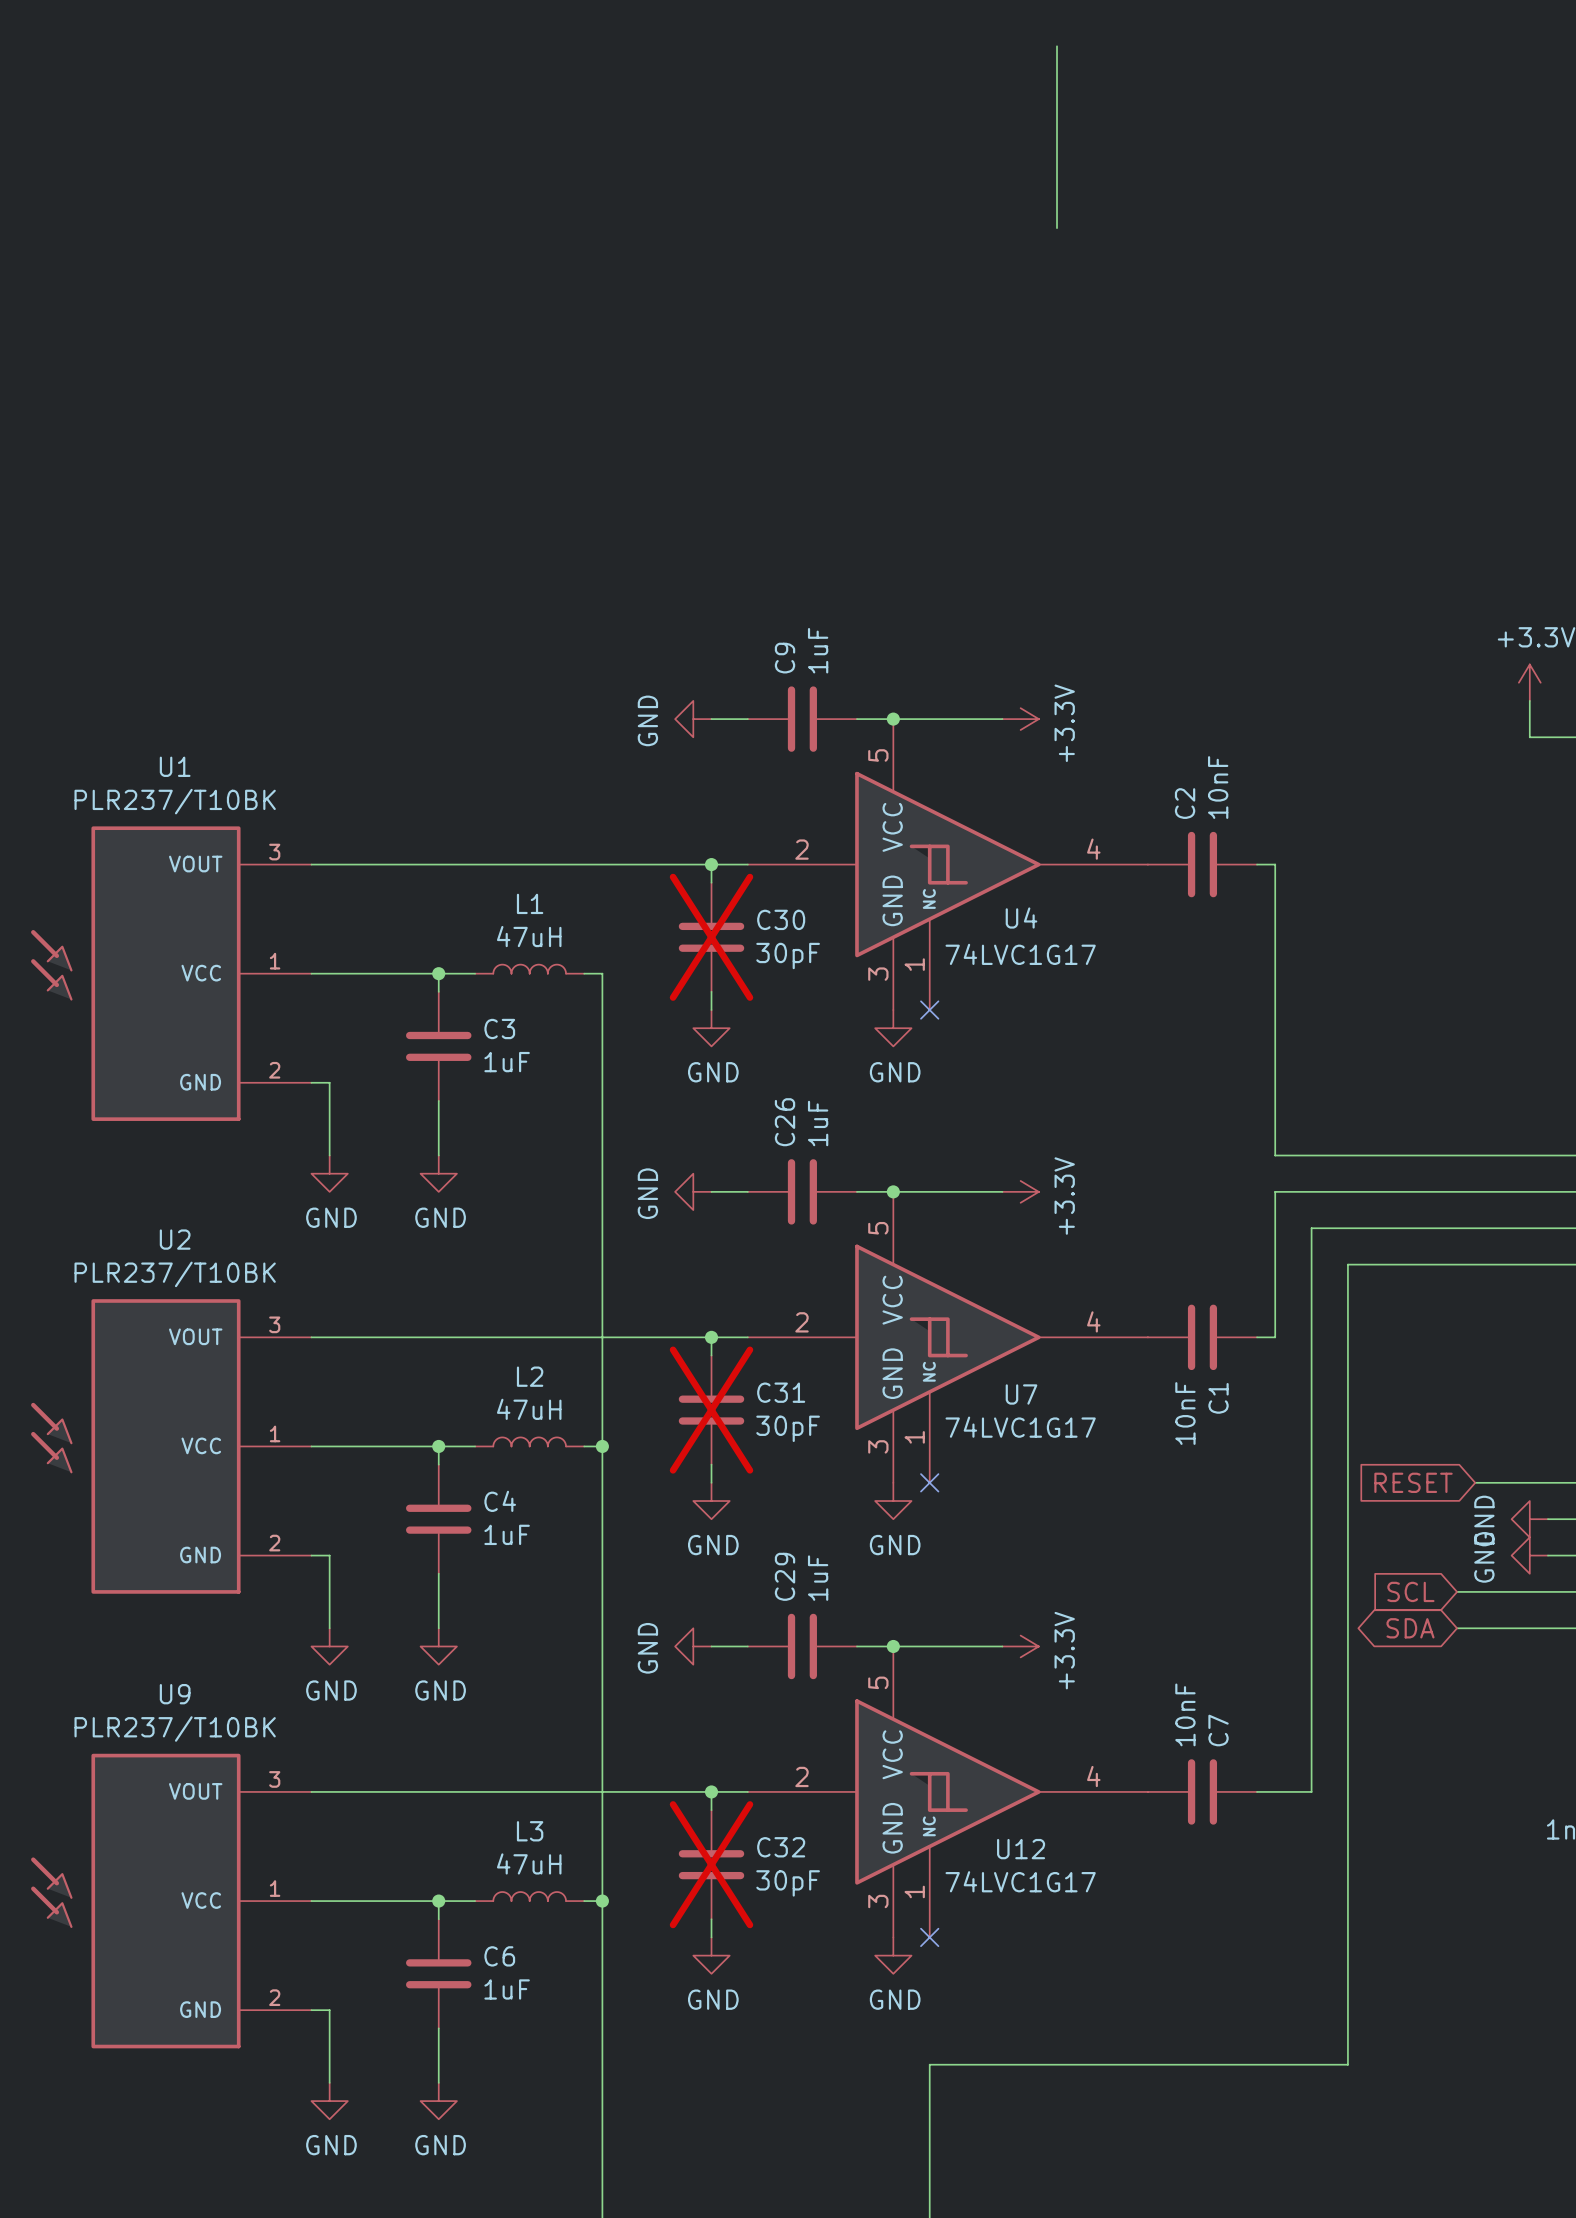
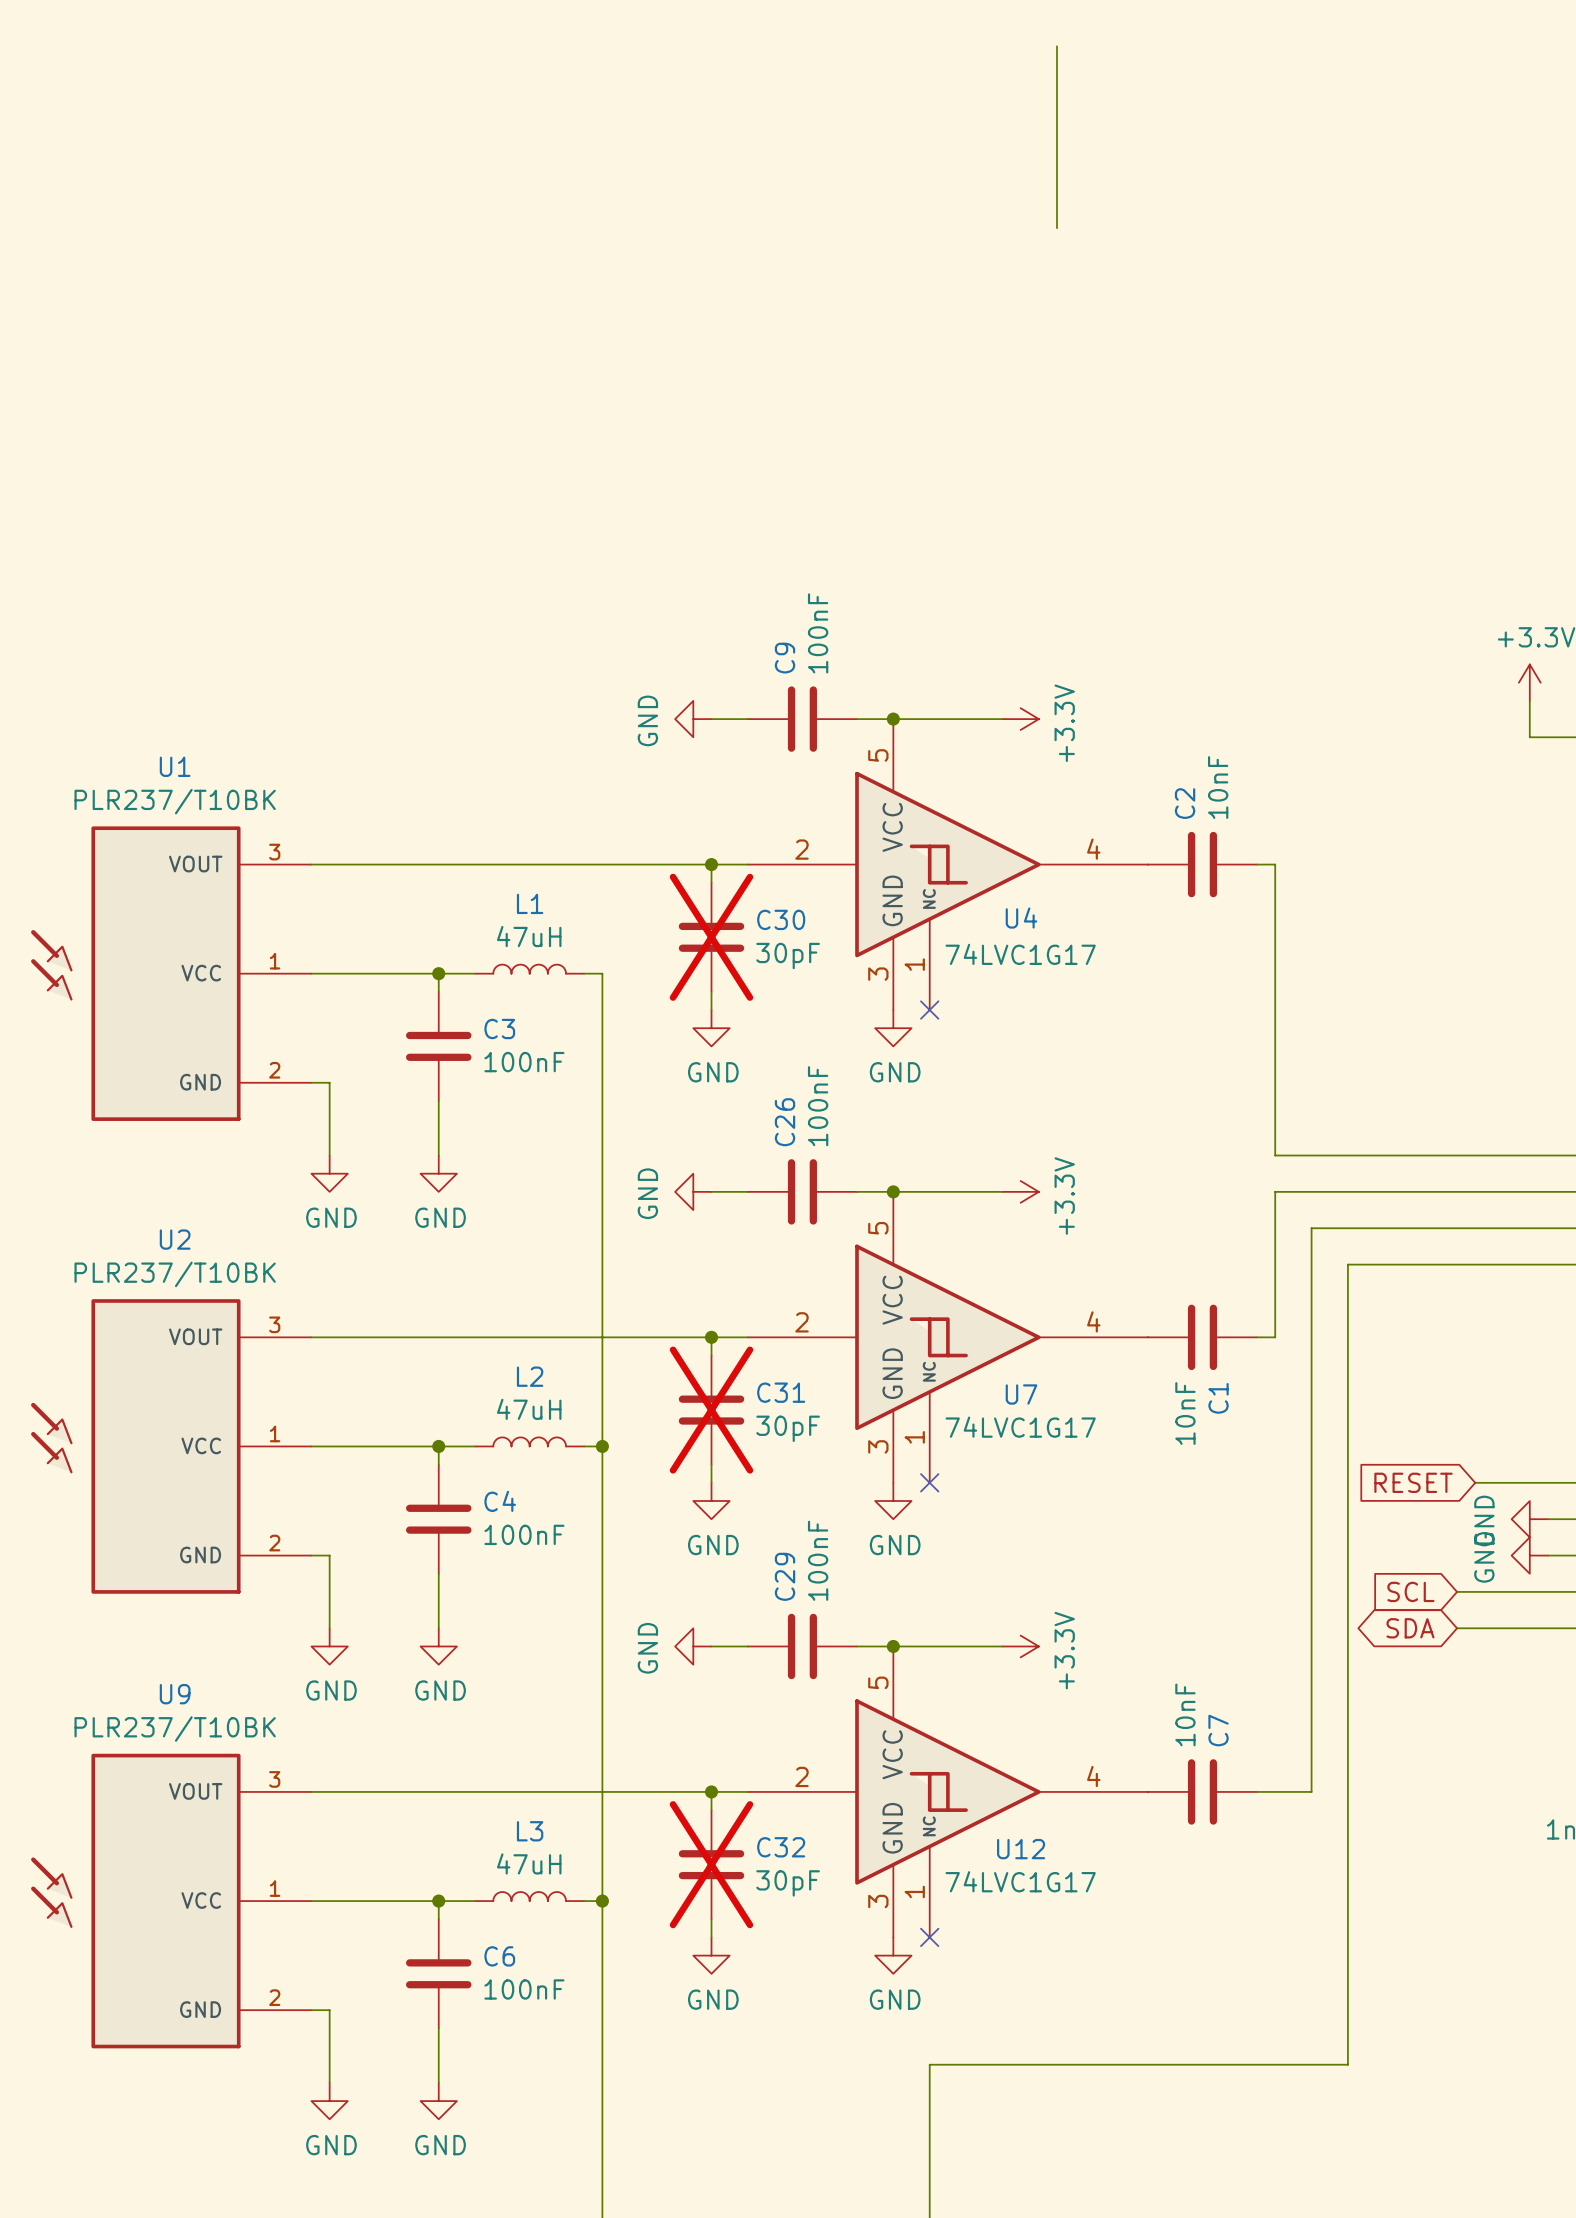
C9 value: 1uF (818, 650) -> 100nF (818, 633)
C3 value: 1uF (507, 1062) -> 100nF (524, 1062)
C26 value: 1uF (818, 1123) -> 100nF (818, 1106)
C4 value: 1uF (507, 1534) -> 100nF (524, 1534)
C29 value: 1uF (818, 1578) -> 100nF (818, 1560)
C6 value: 1uF (507, 1989) -> 100nF (524, 1989)

